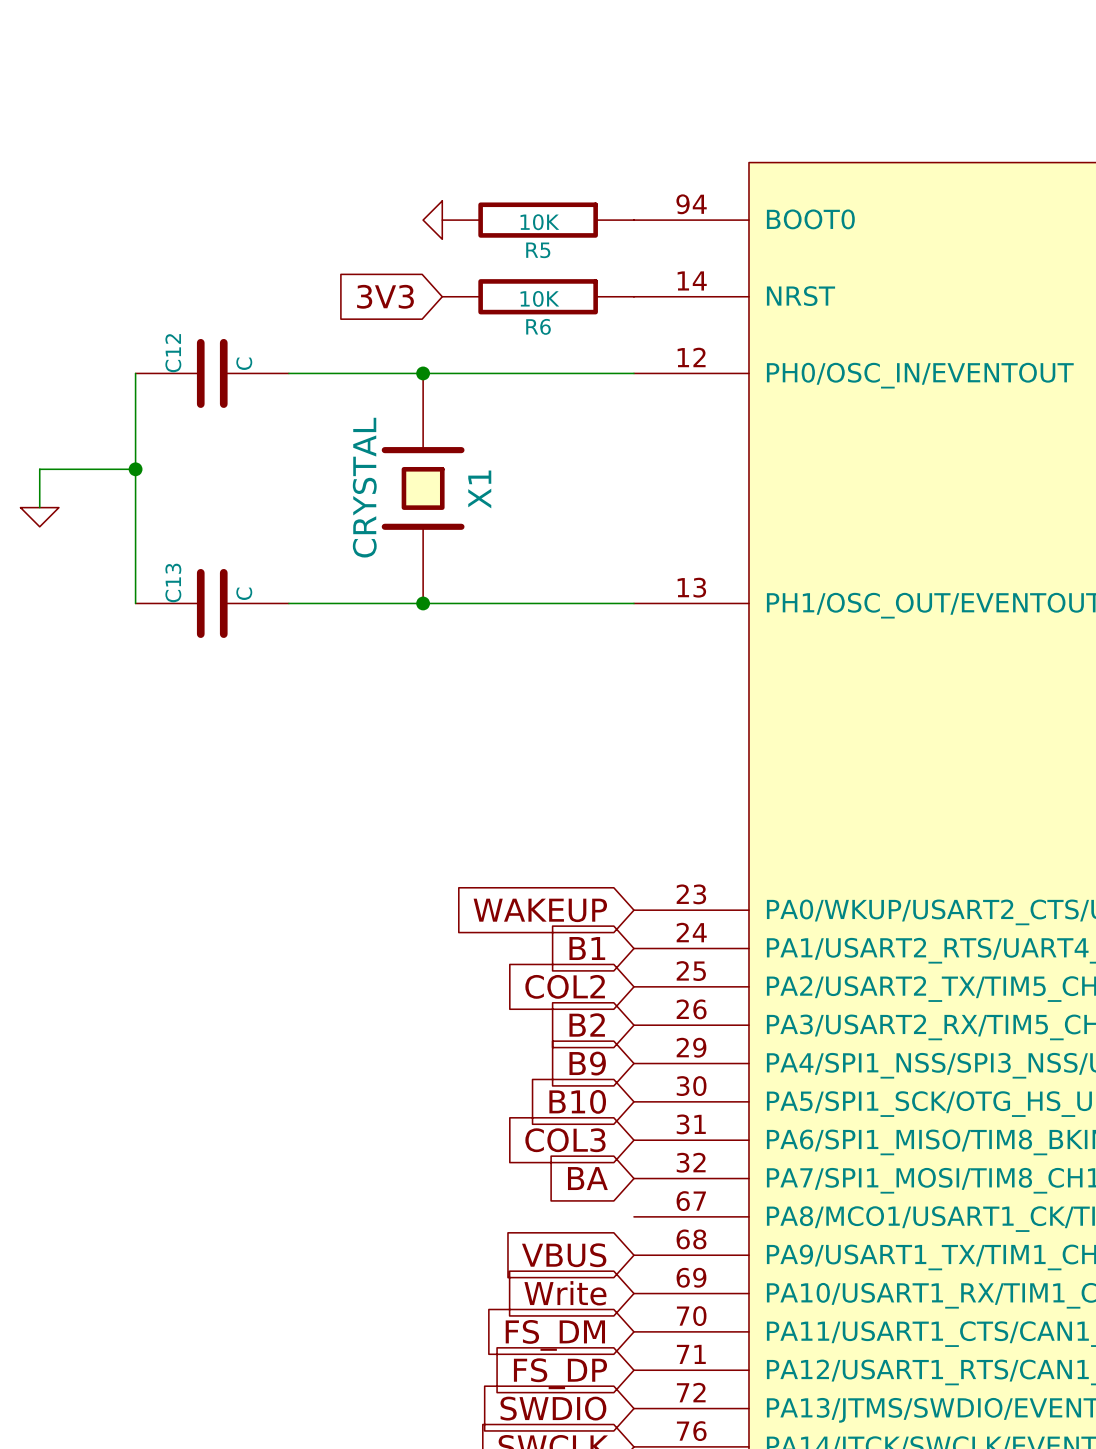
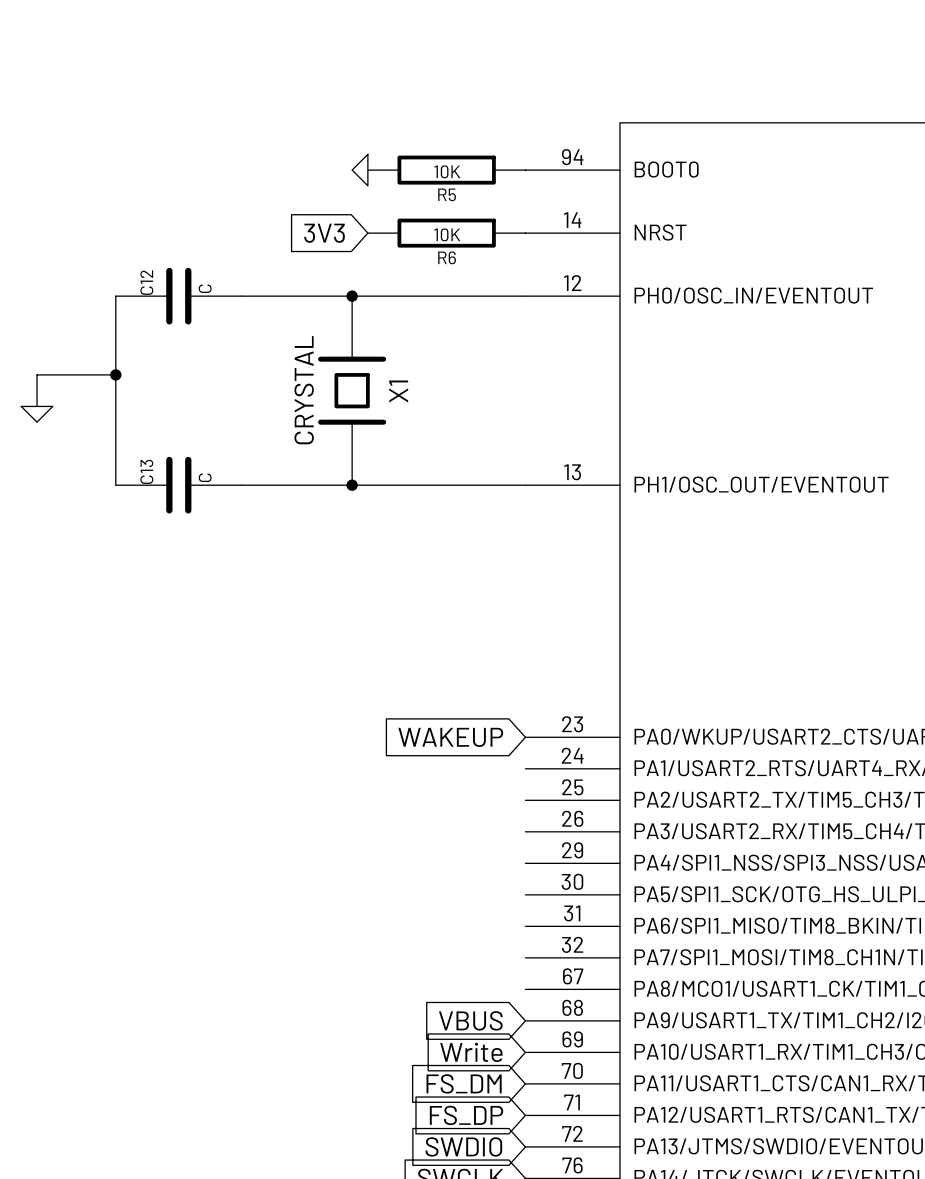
global label: B1 (587, 948) -> none
global label: COL2 (565, 986) -> none
global label: B2 (587, 1024) -> none
global label: B9 (587, 1063) -> none
global label: B10 (577, 1101) -> none
global label: COL3 (565, 1140) -> none
global label: BA (587, 1178) -> none

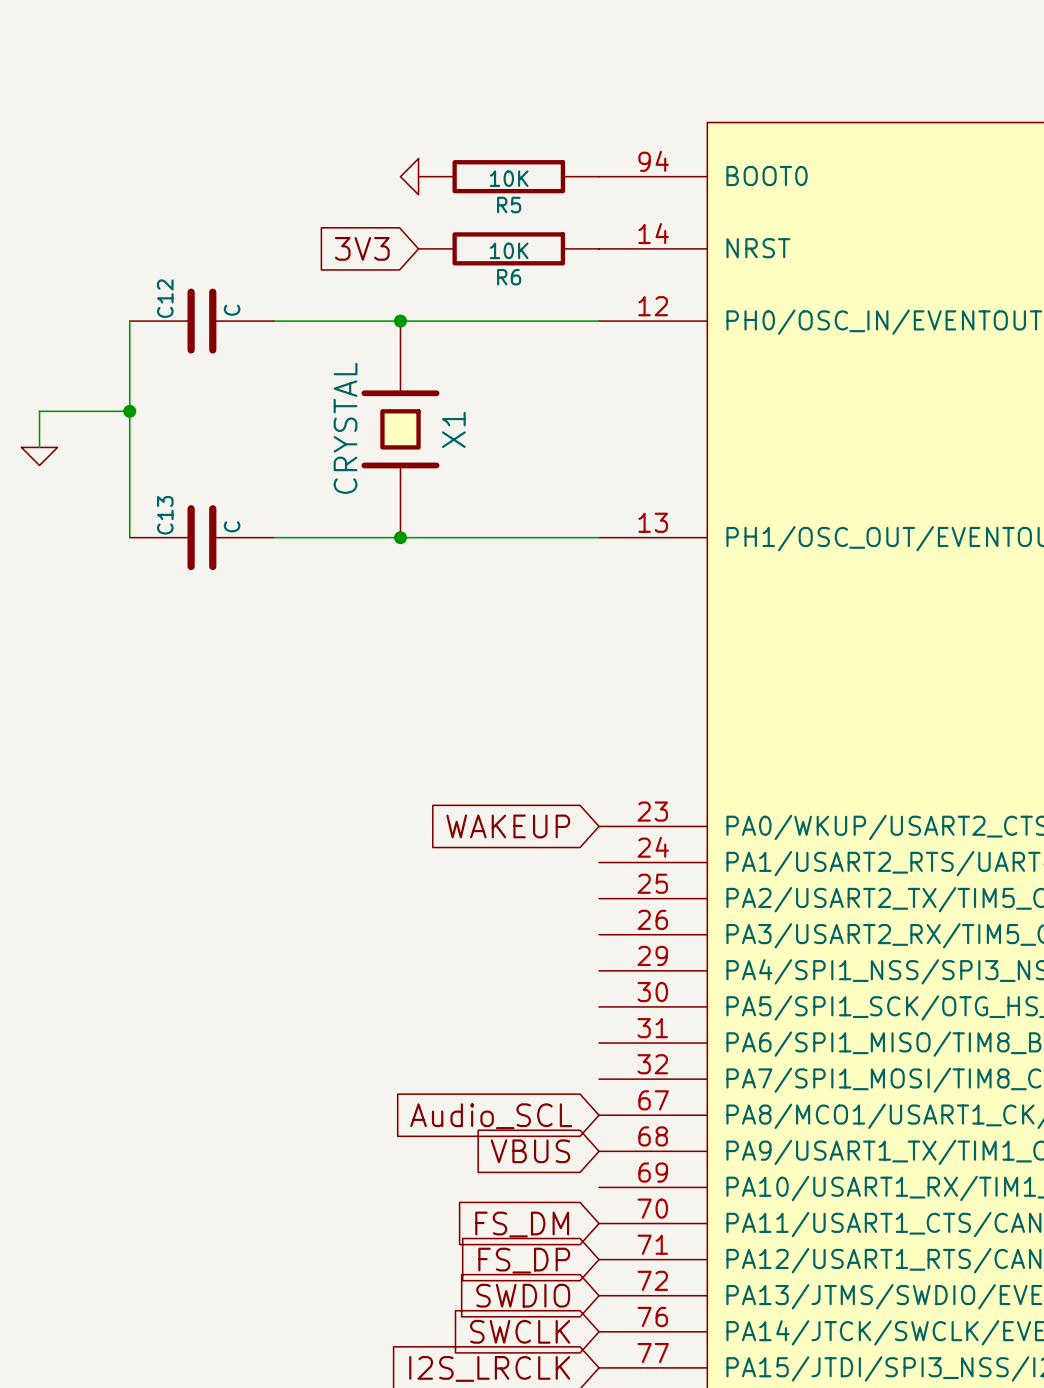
global label: none -> Audio_SCL (491, 1116)
global label: Write (471, 1052) -> none

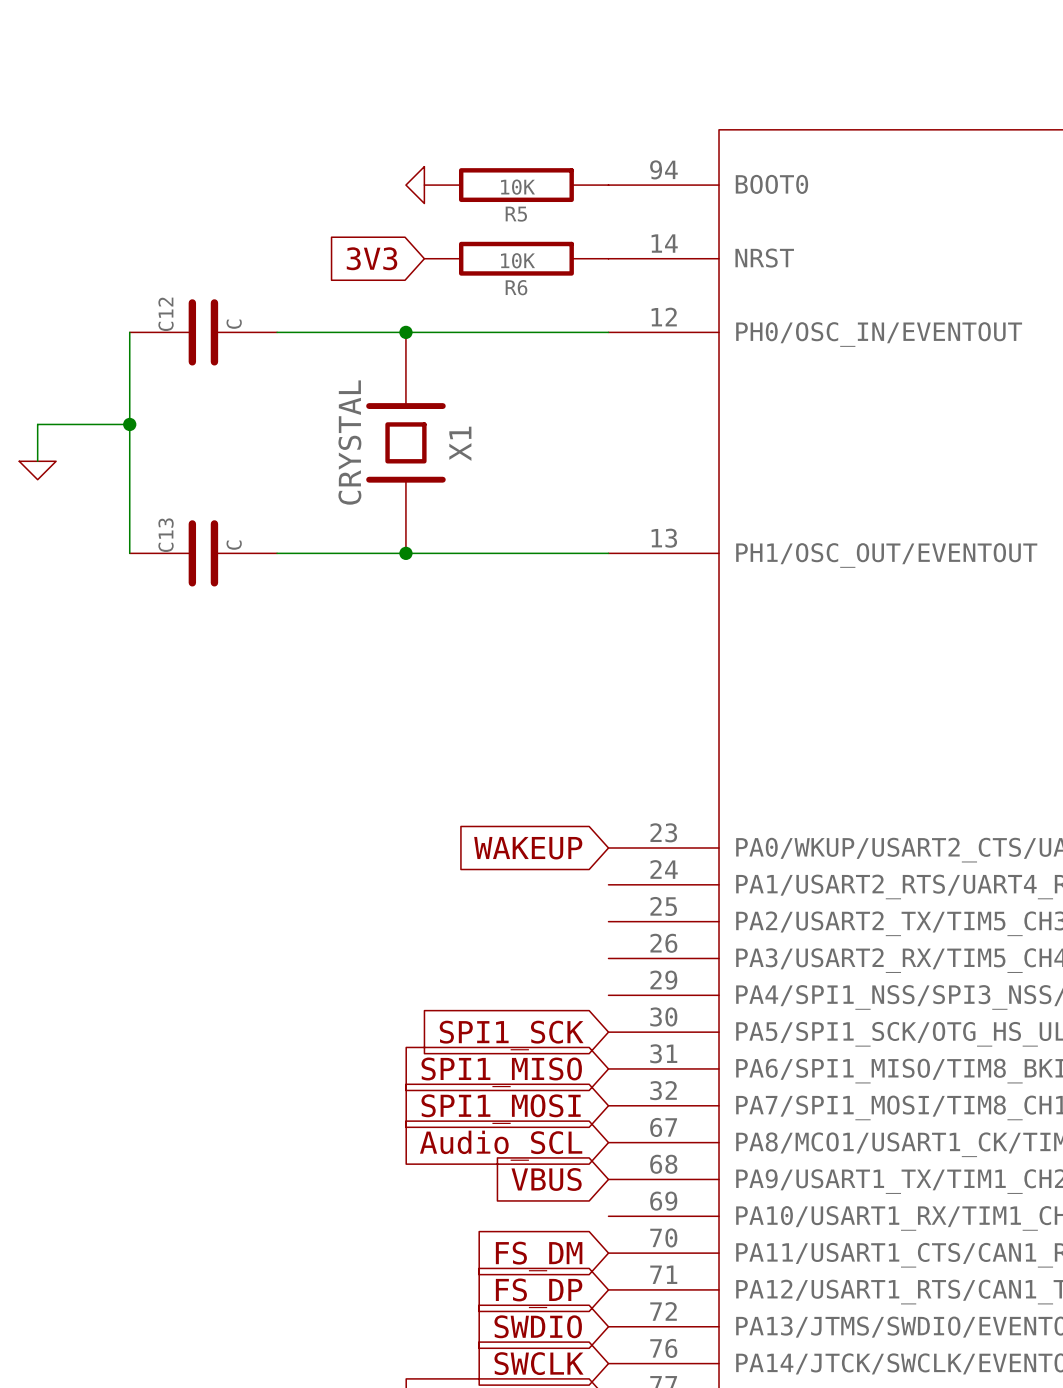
global label: none -> SPI1_SCK (511, 1035)
global label: none -> SPI1_MISO (501, 1072)
global label: none -> SPI1_MOSI (501, 1109)

